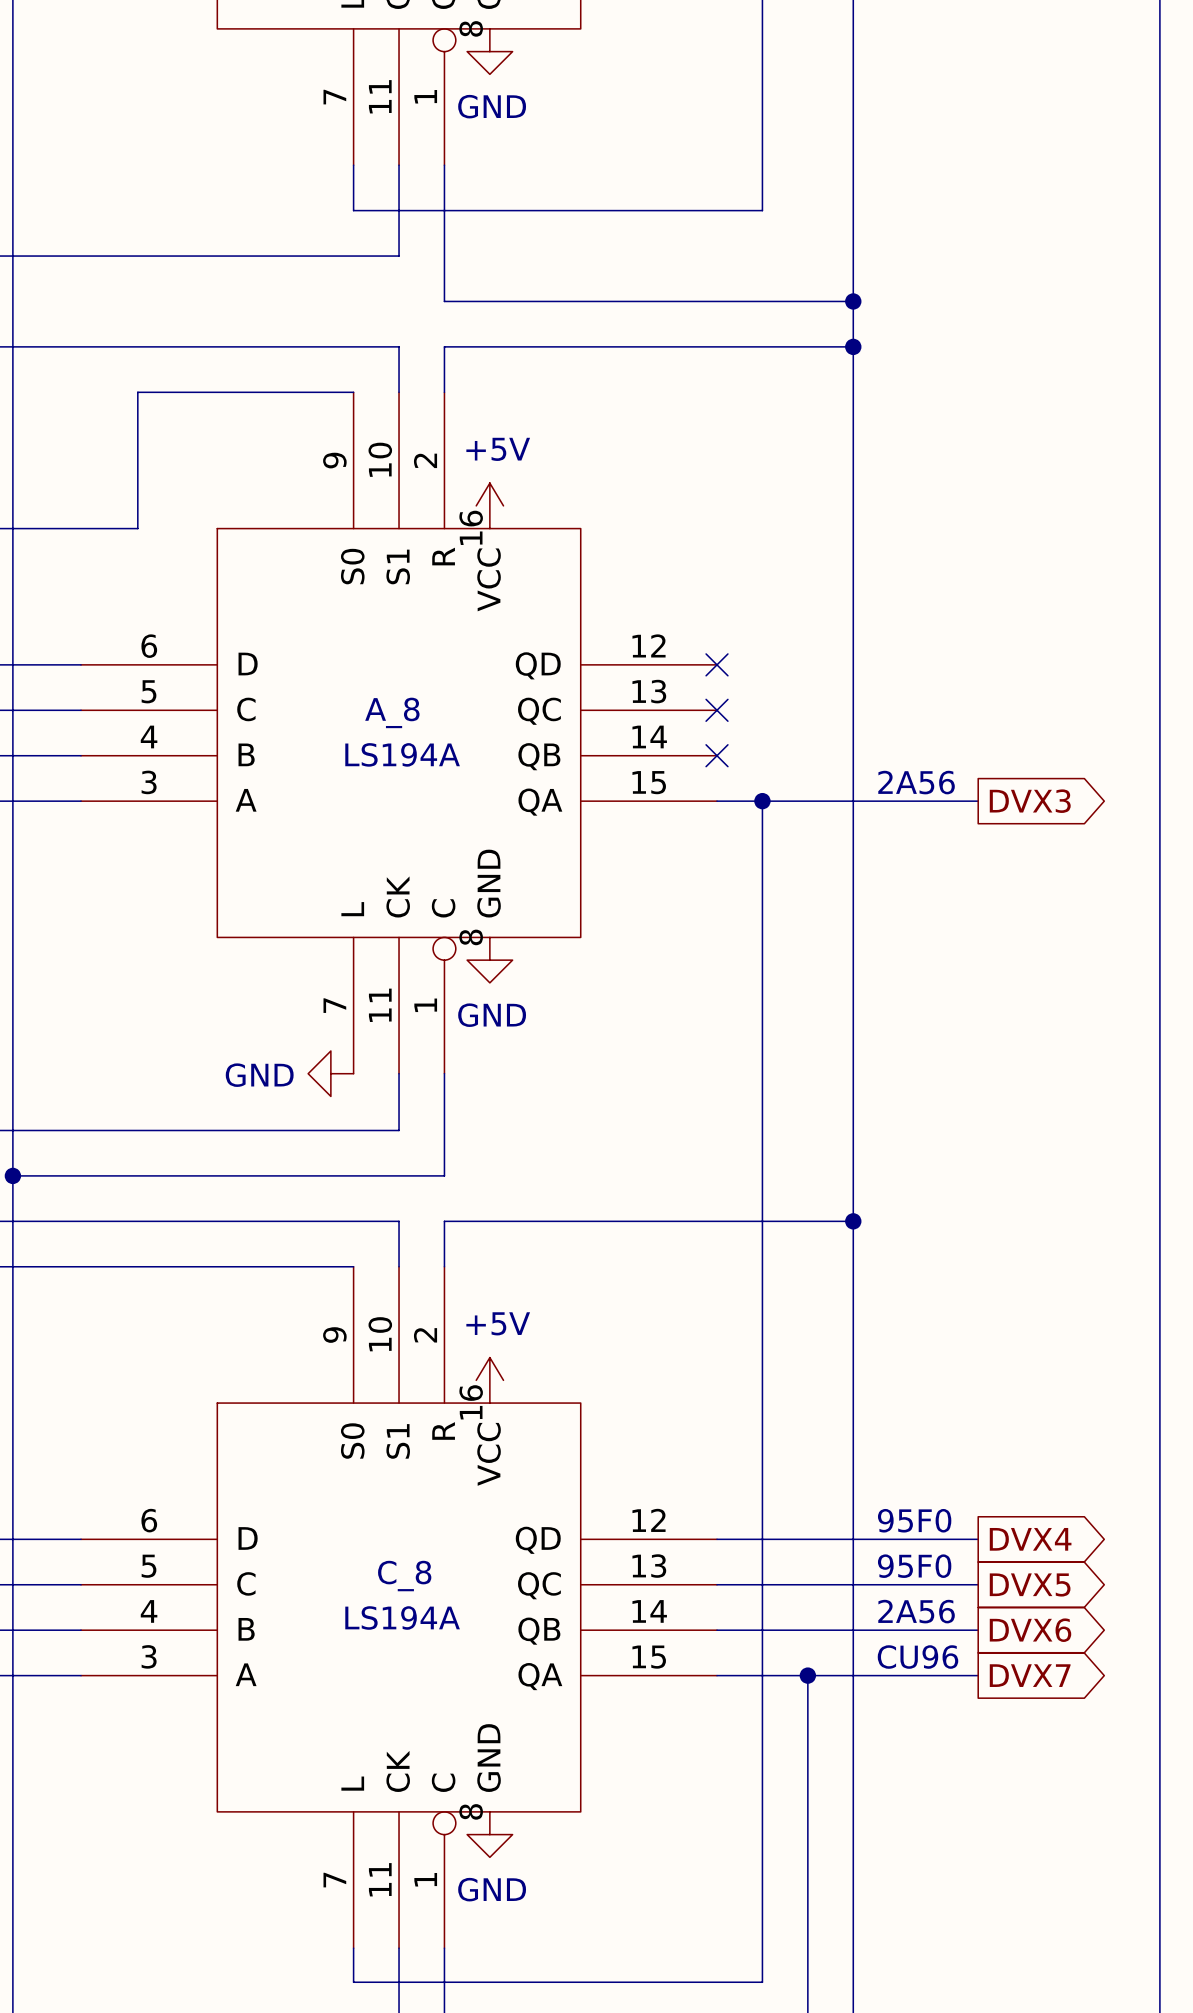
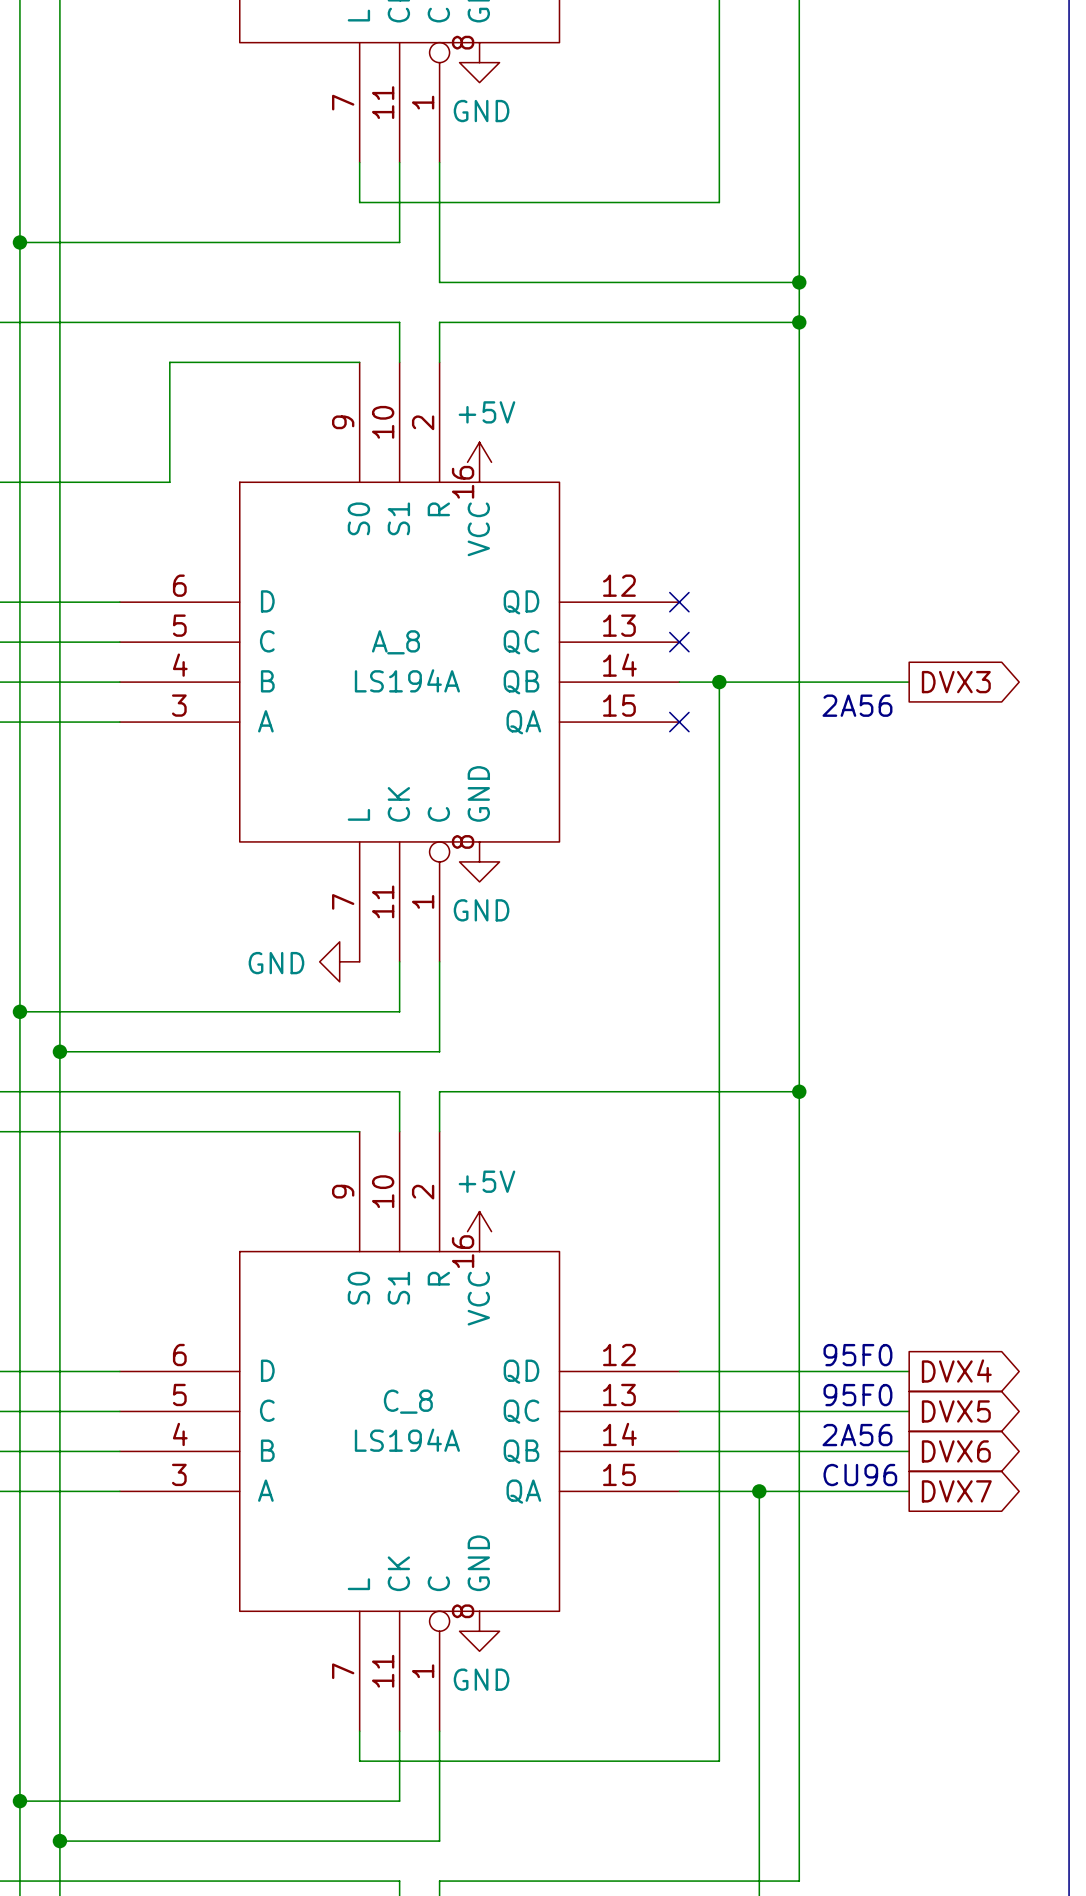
no-connect mark position: (717, 755) -> (679, 722)
wire: none -> (719, 682) (719, 722)
wire: (717, 801) (978, 801) -> (679, 682) (909, 682)
junction position: (762, 801) -> (719, 682)
global label position: DVX3 (1030, 801) -> DVX3 (956, 682)

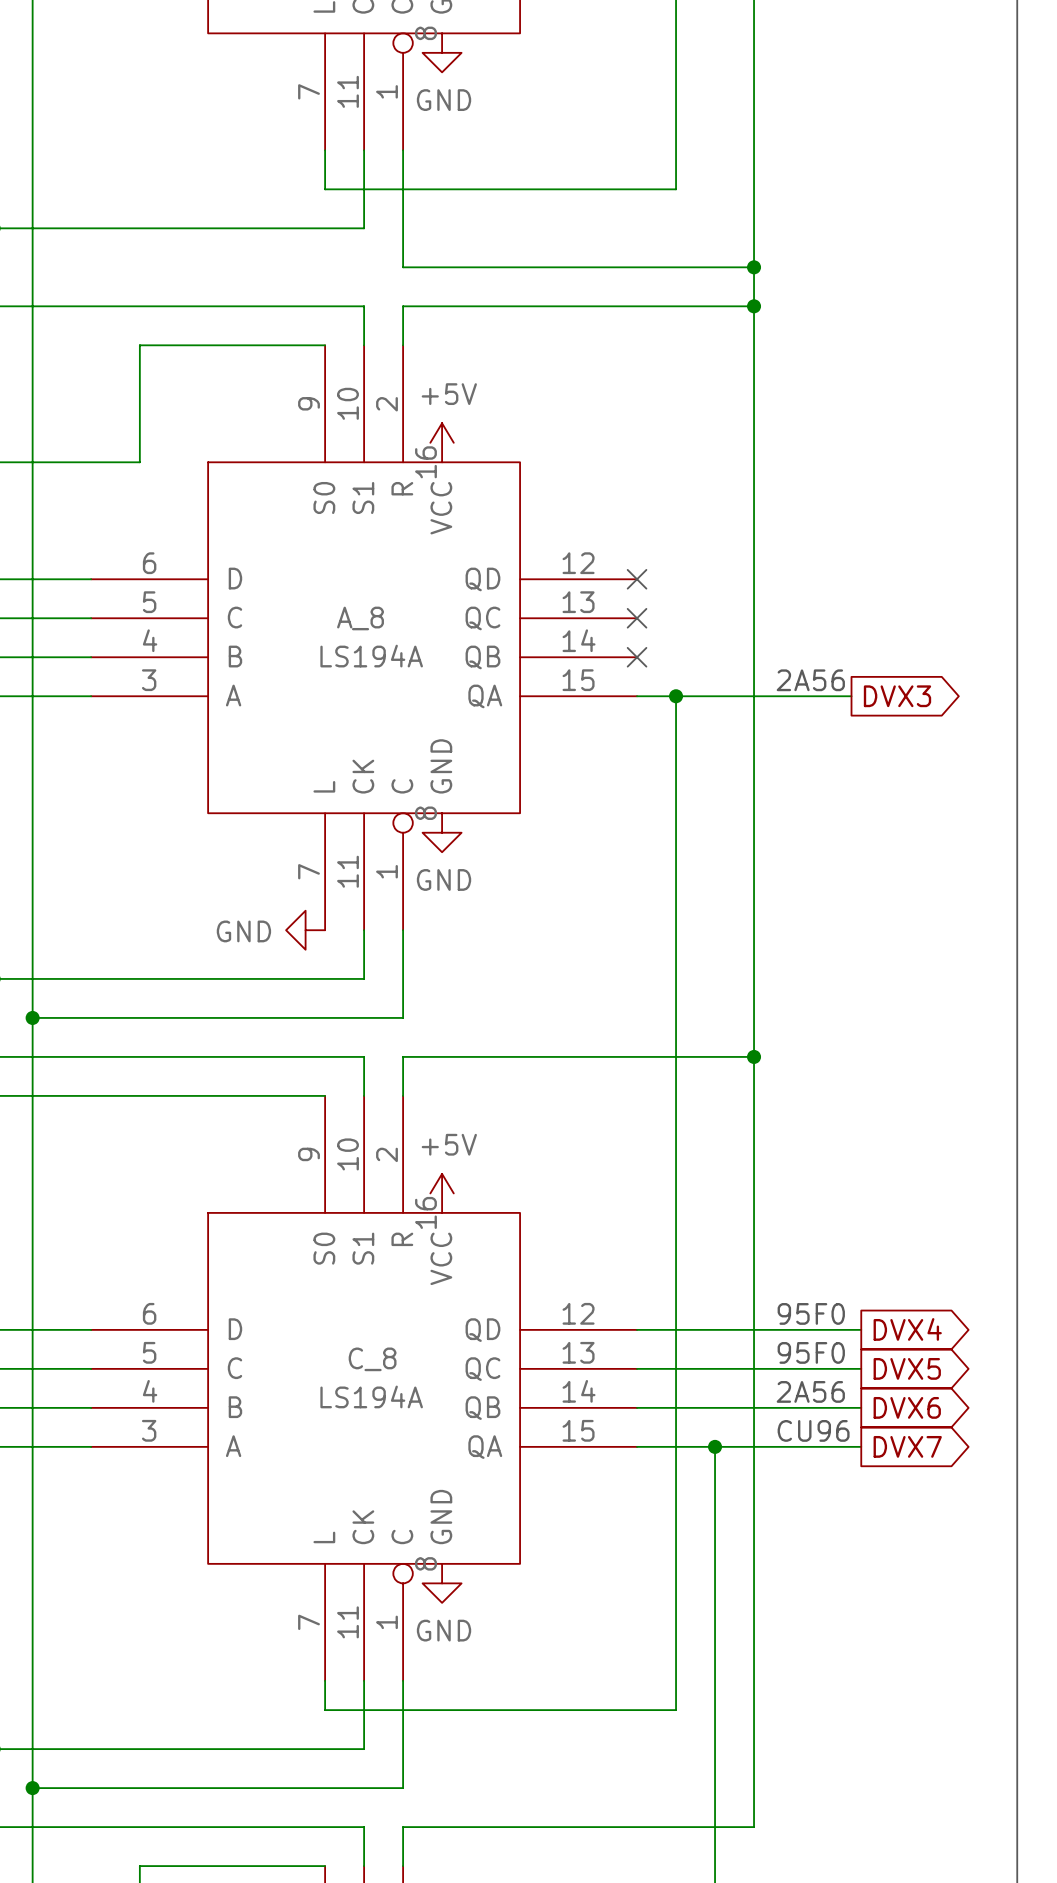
wire: (679, 682) (909, 682) -> none
wire: (719, 682) (719, 722) -> none
junction position: (719, 682) -> (676, 696)
global label position: DVX3 (956, 682) -> DVX3 (897, 696)
wire: none -> (637, 696) (851, 696)
no-connect mark position: (679, 722) -> (637, 657)

